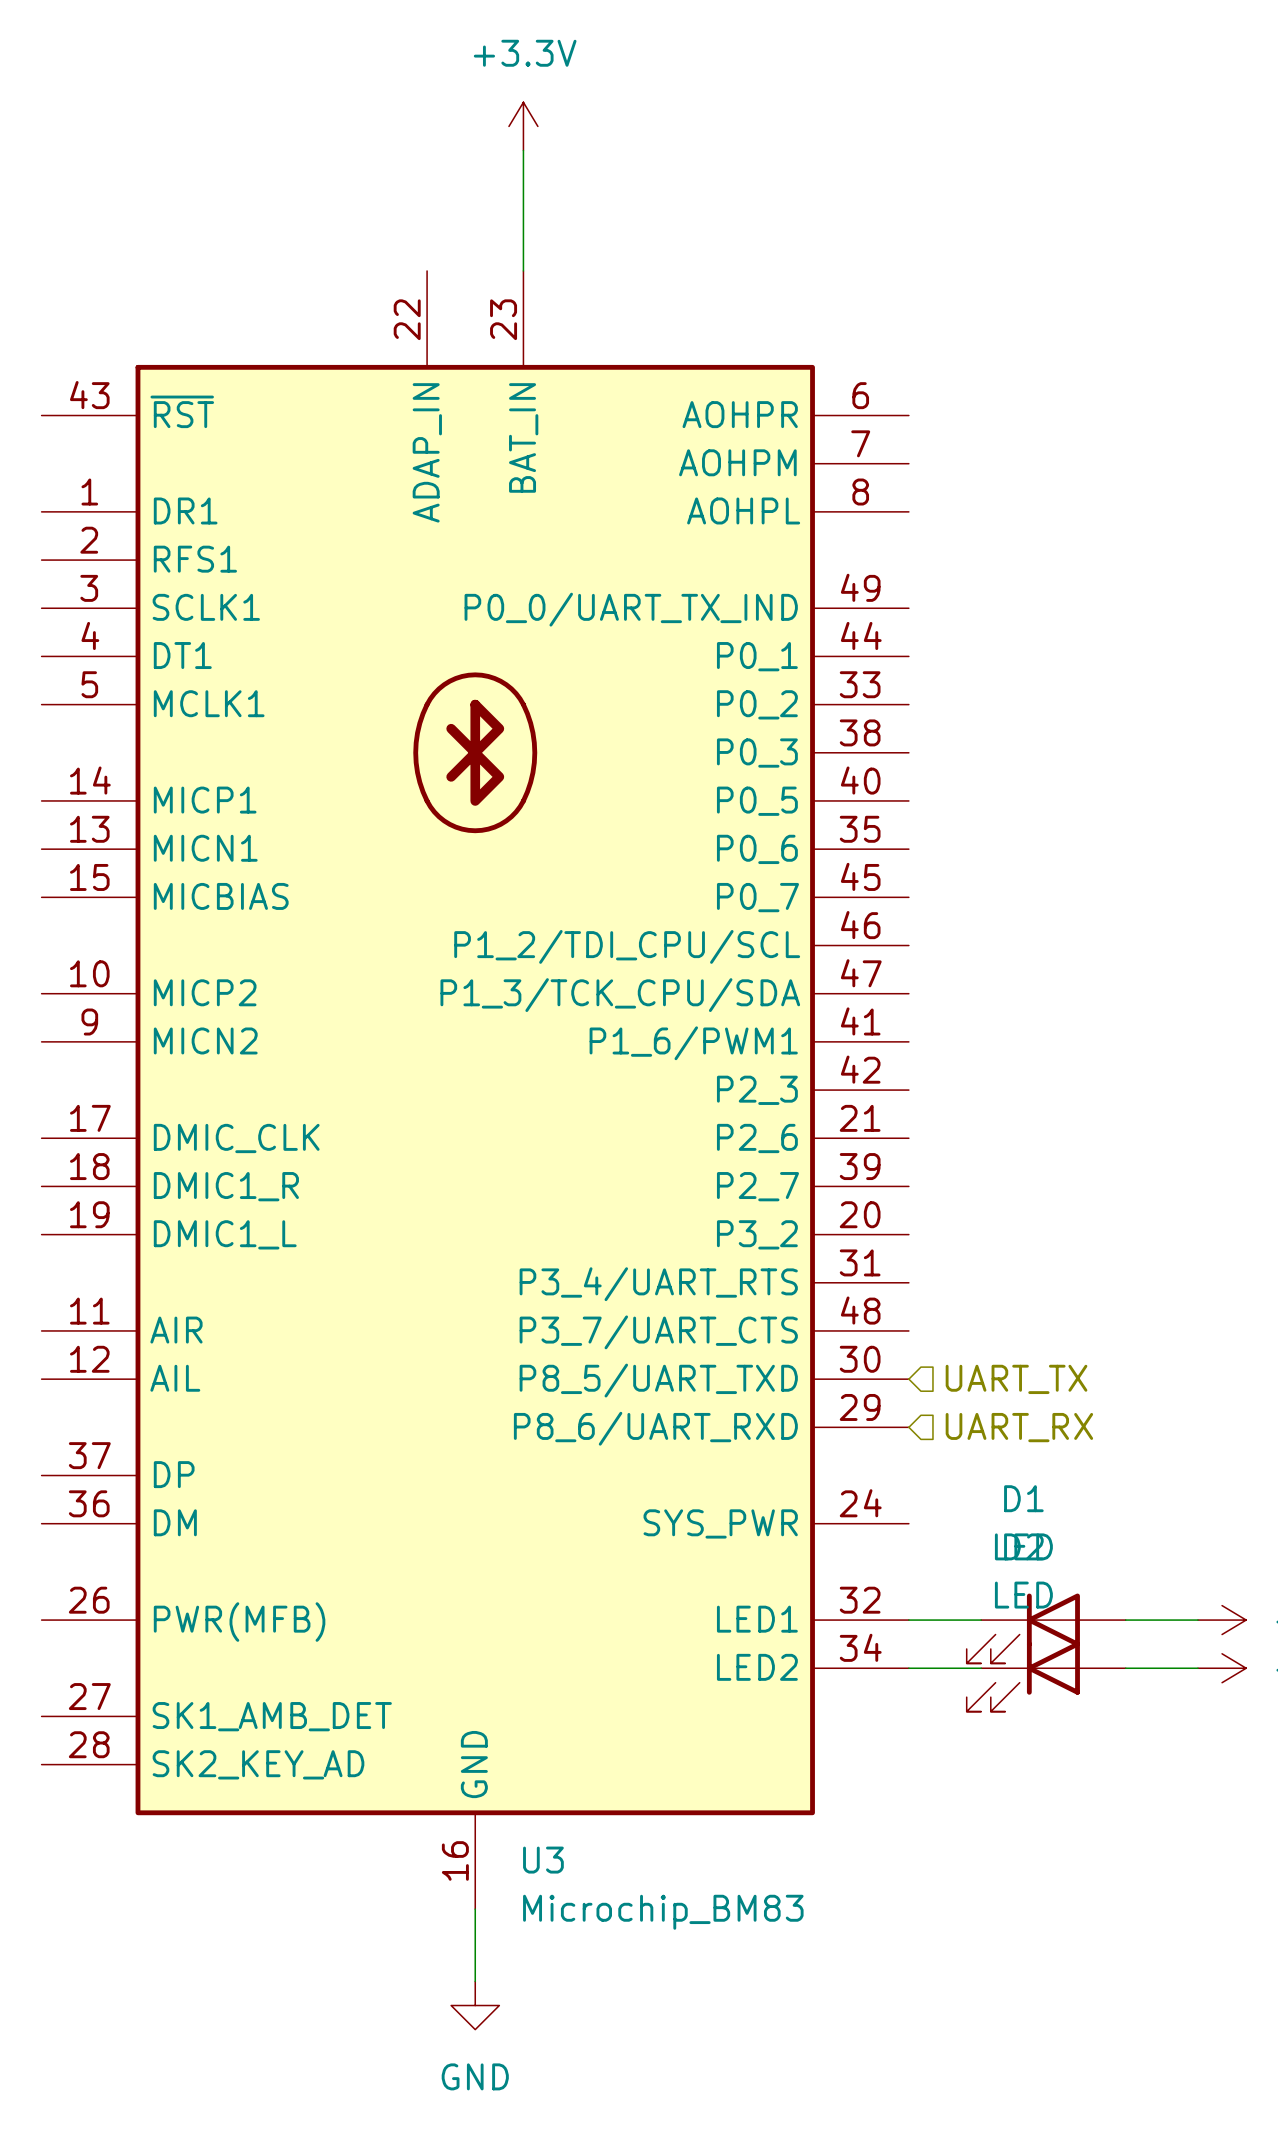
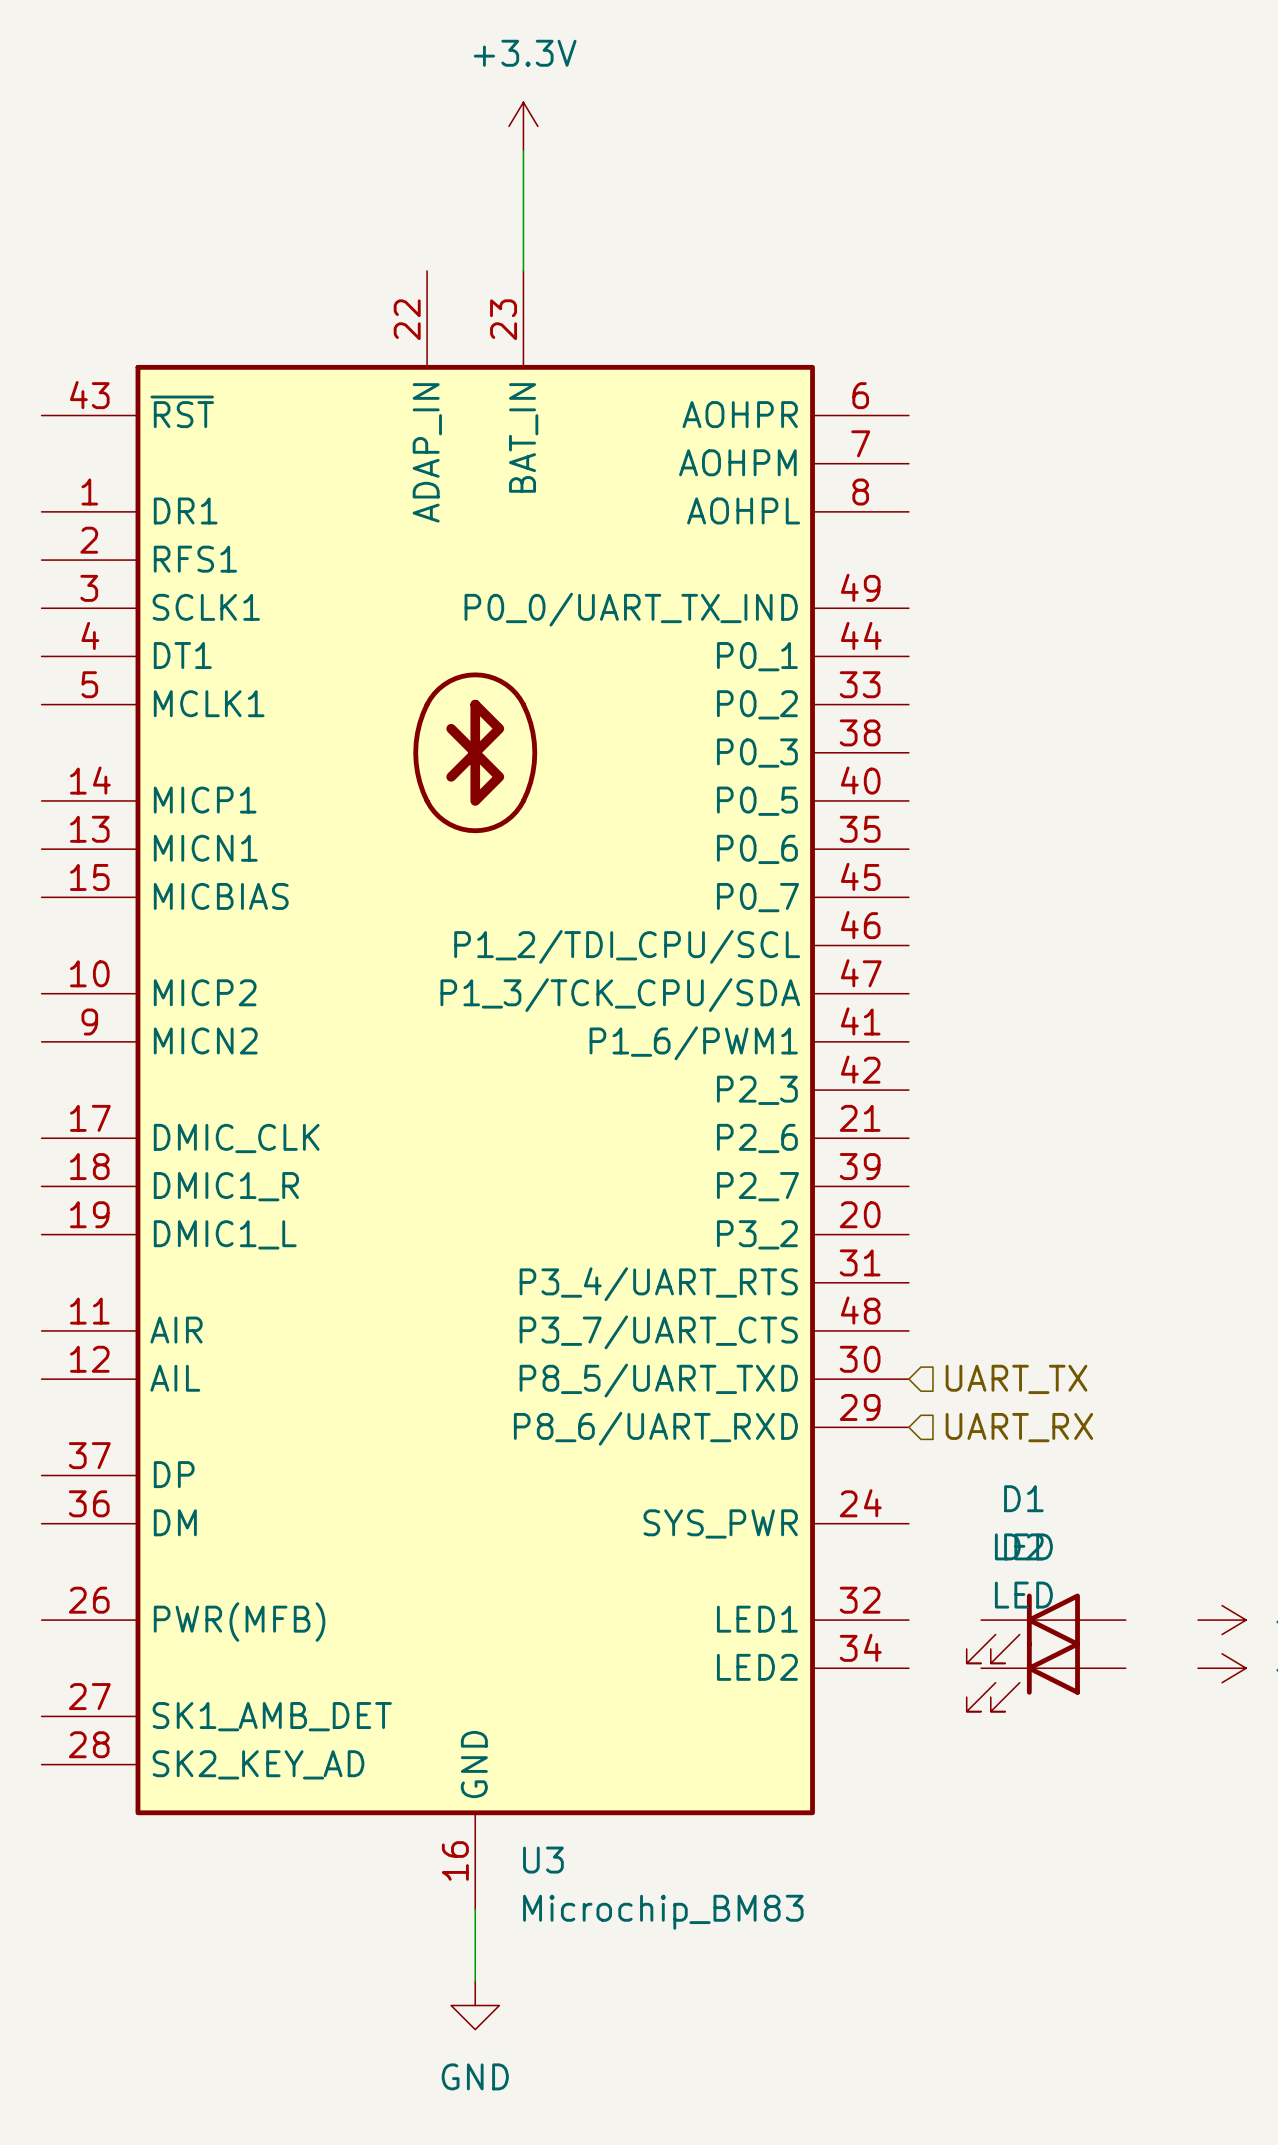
wire: (908, 1620) (981, 1620) -> none
wire: (1125, 1620) (1197, 1620) -> none
wire: (908, 1668) (981, 1668) -> none
wire: (1125, 1668) (1197, 1668) -> none

